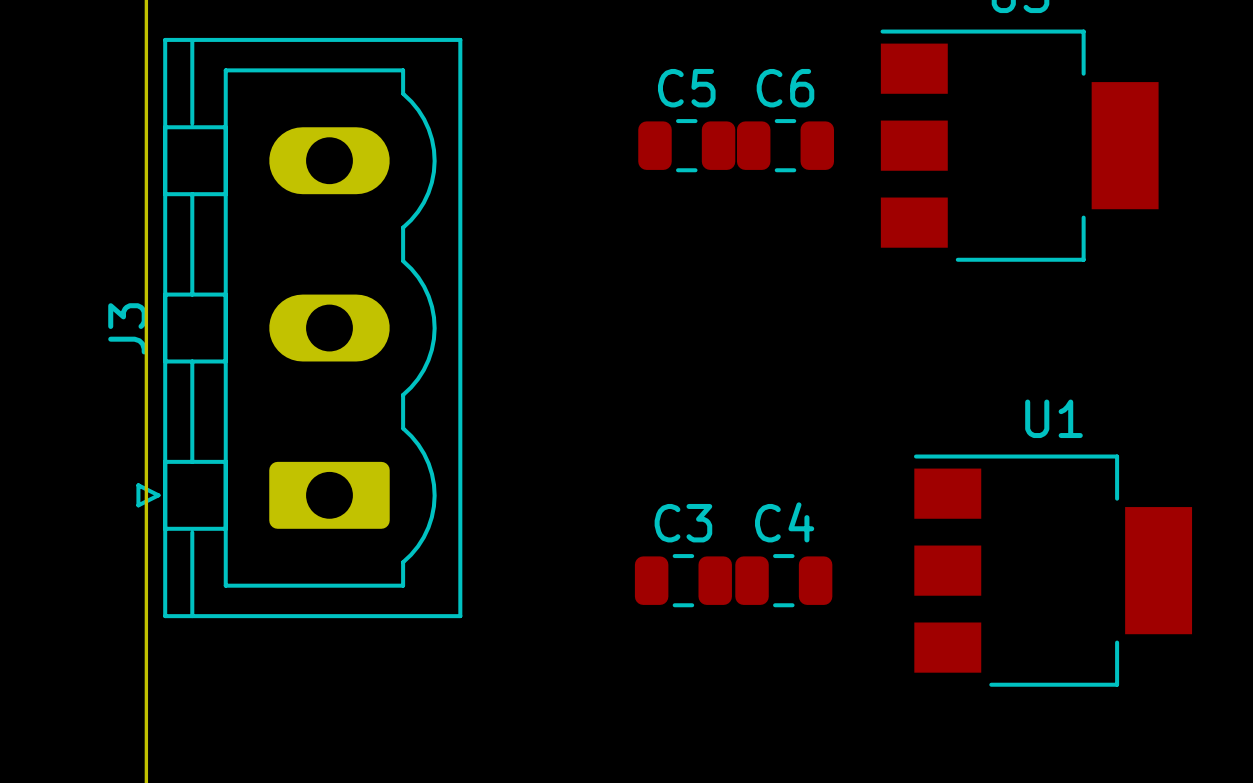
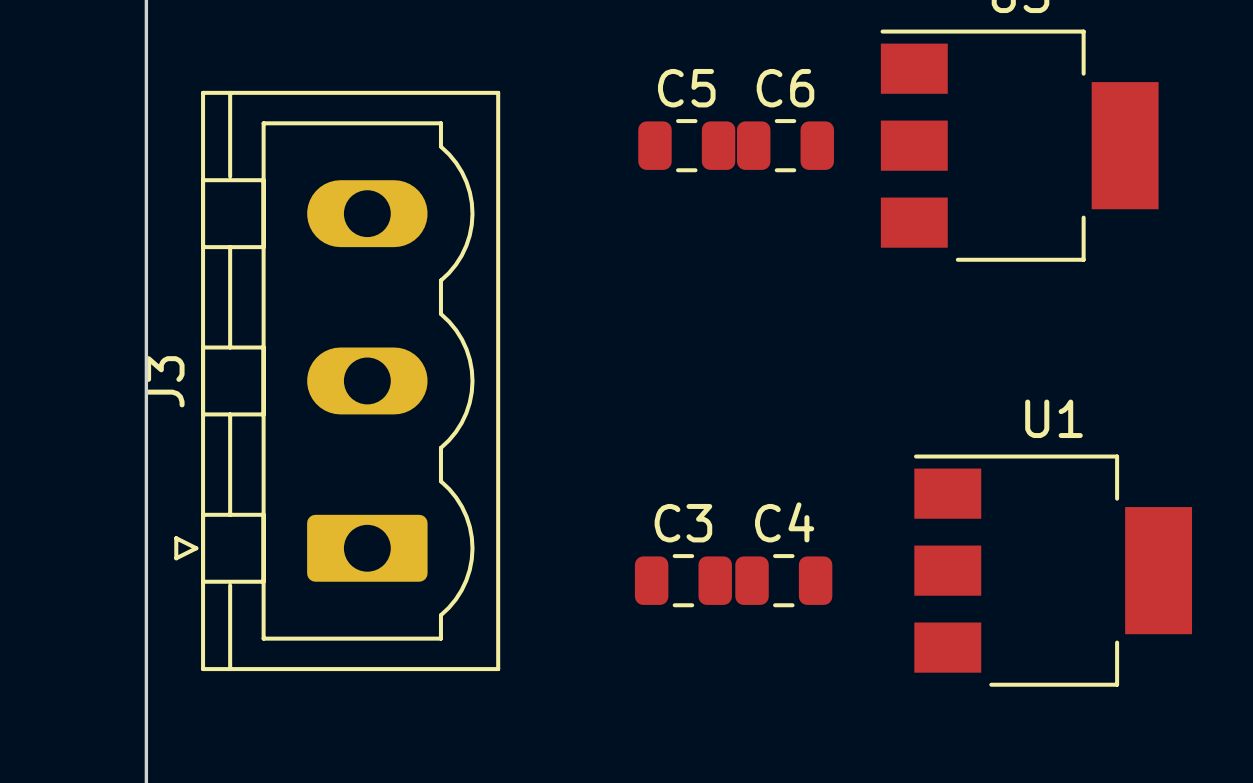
J3 position: (299, 328) -> (337, 380)

